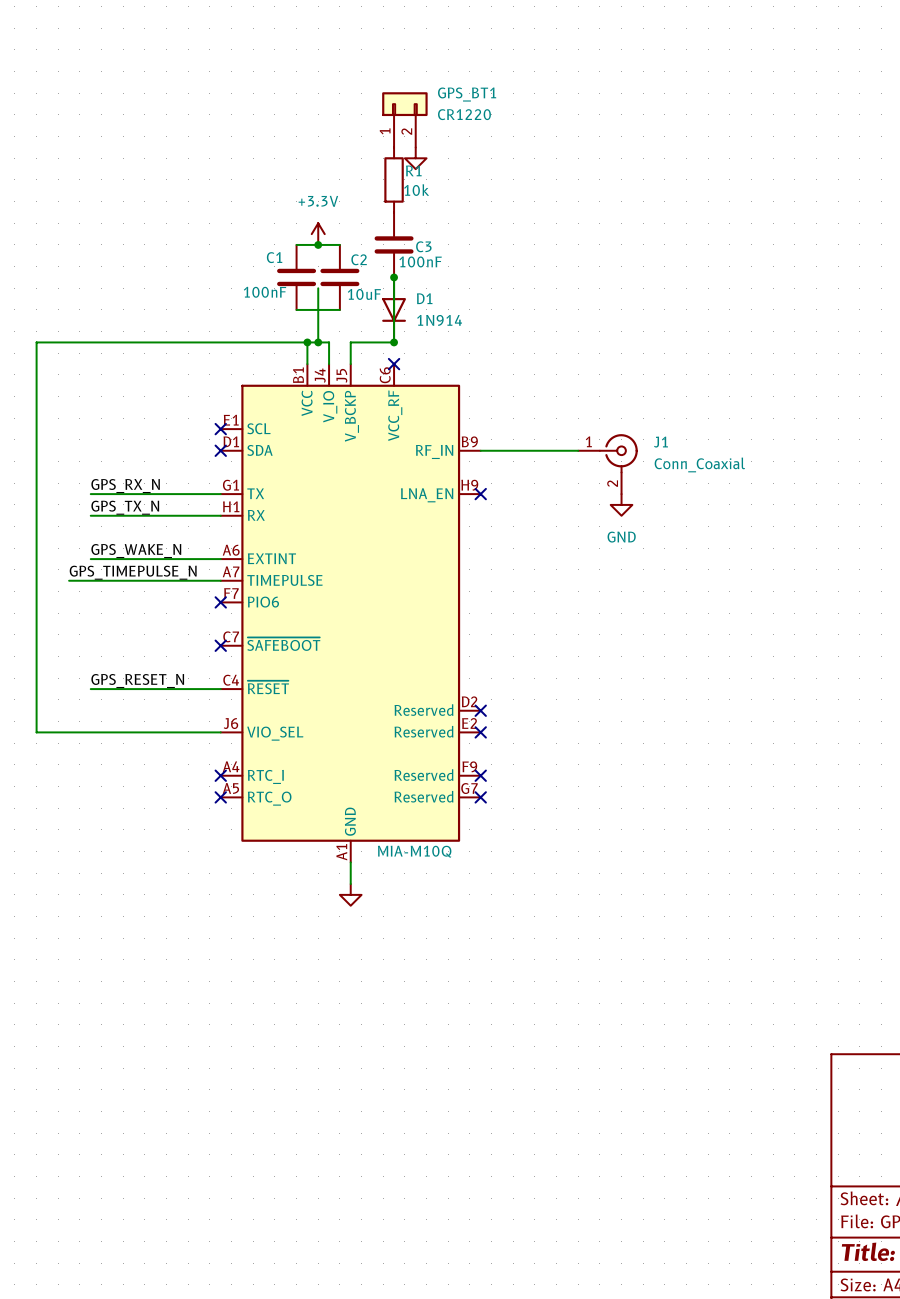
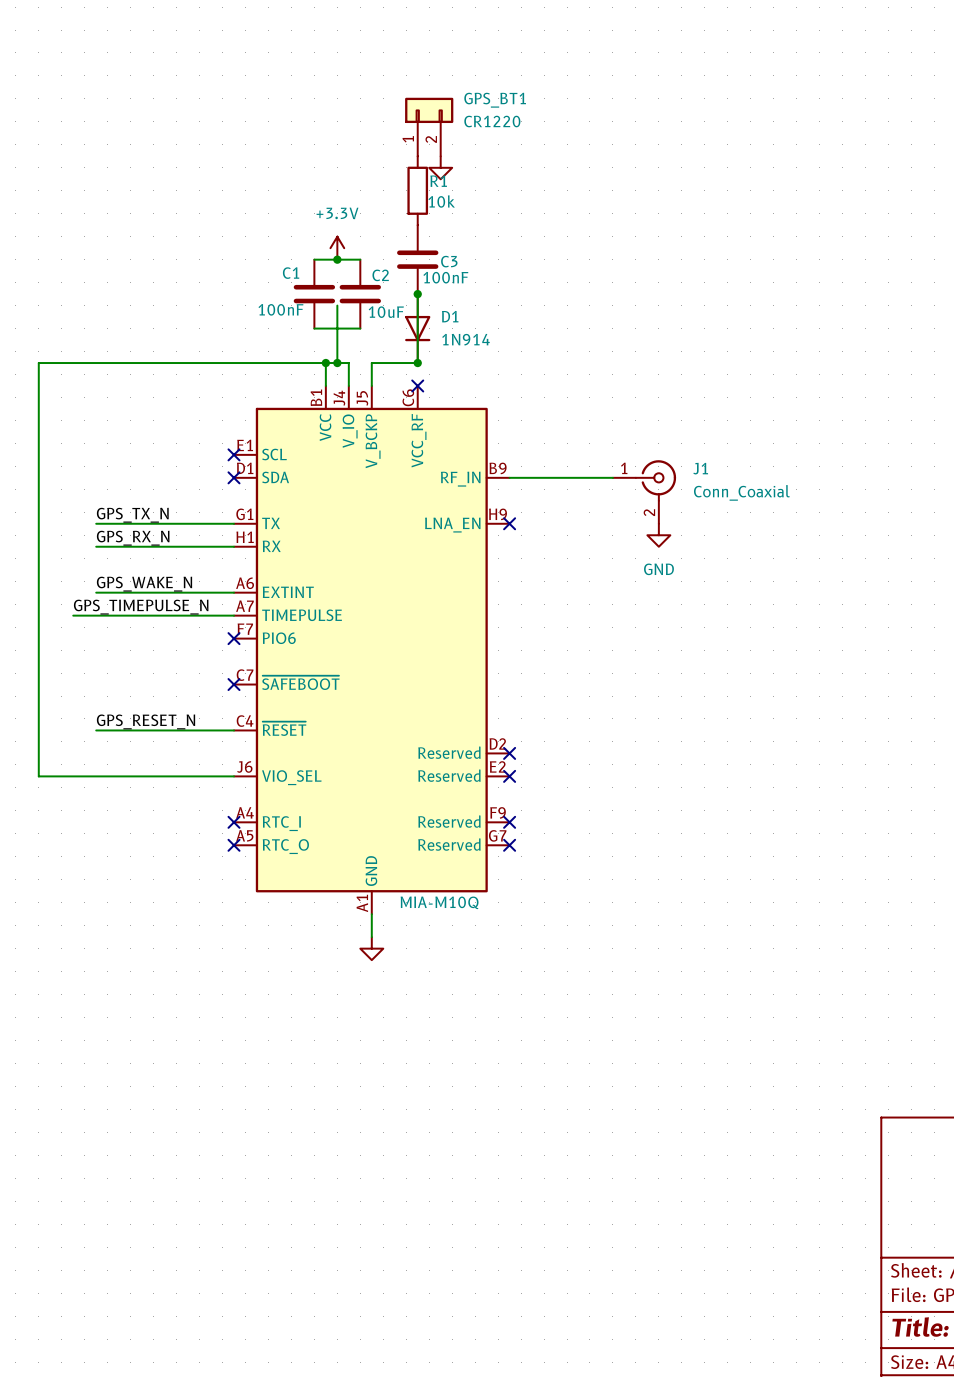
label: GPS_RX_N (125, 486) -> GPS_TX_N (132, 515)
label: GPS_TX_N (125, 507) -> GPS_RX_N (133, 538)

